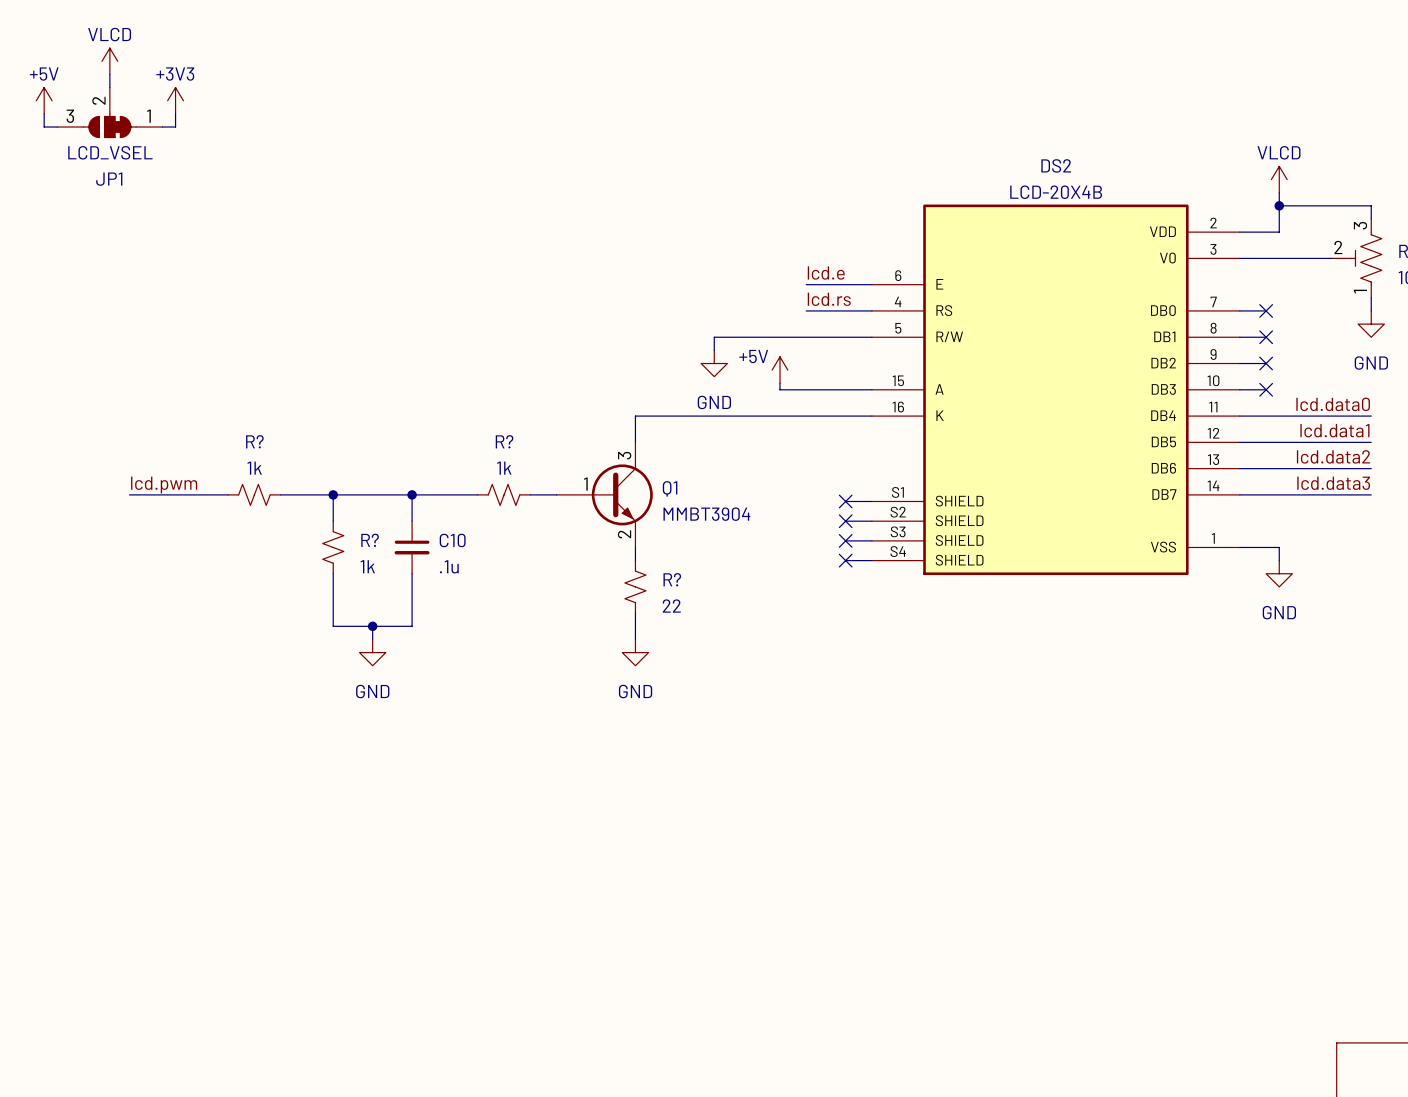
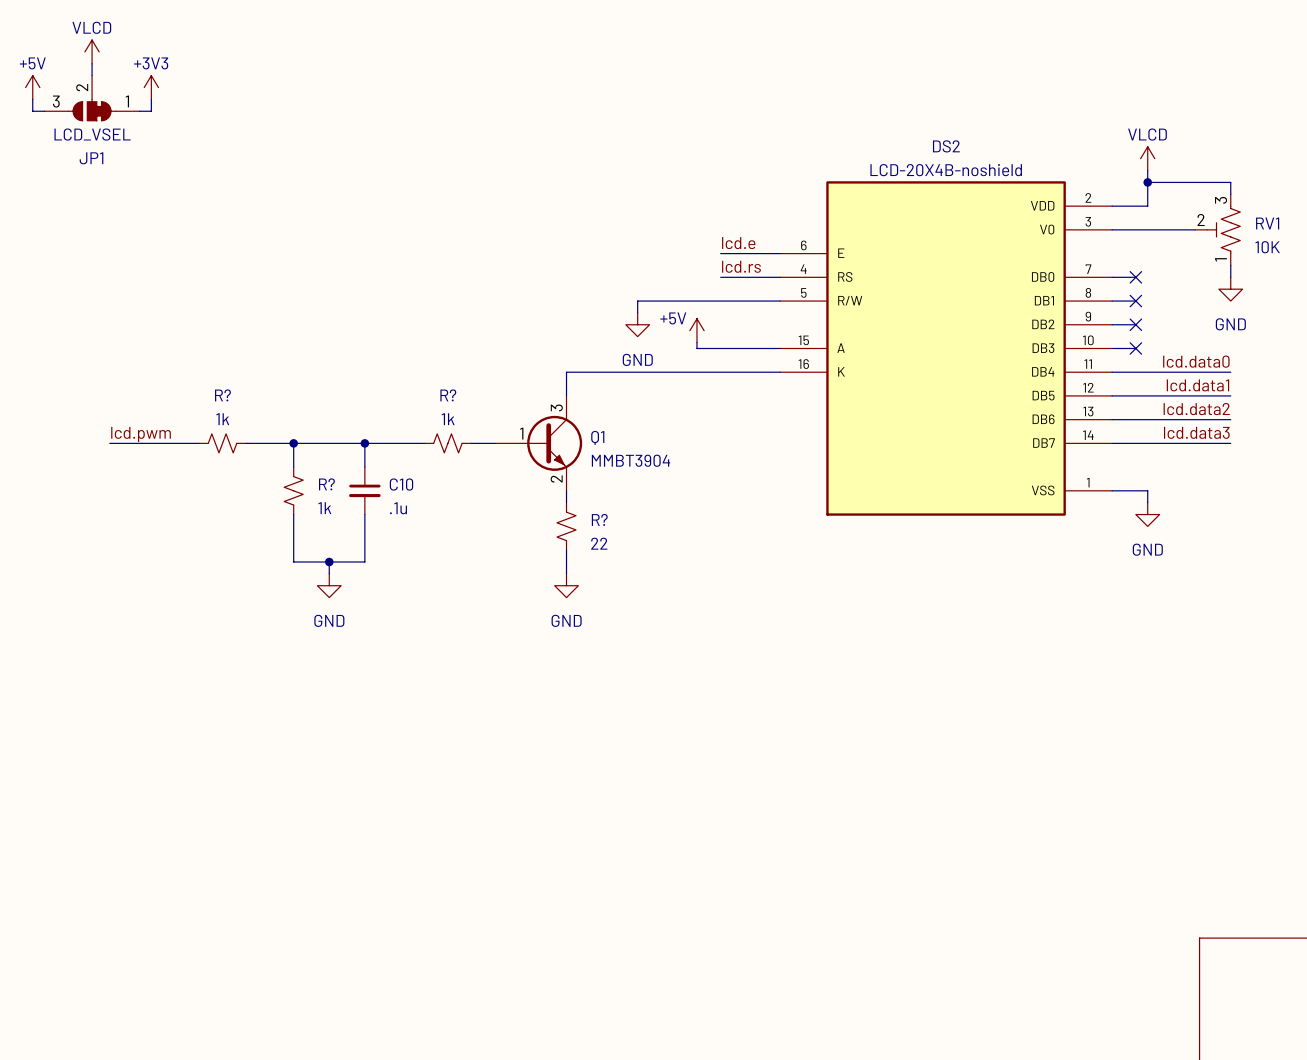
DS2 value: LCD-20X4B (1056, 192) -> LCD-20X4B-noshield (946, 170)
DS2 symbol: [871, 204, 1240, 576] -> [780, 181, 1113, 516]
wire: (845, 501) (871, 501) -> none
no-connect mark: (845, 501) -> none
wire: (845, 521) (871, 521) -> none
no-connect mark: (845, 521) -> none
wire: (845, 540) (871, 540) -> none
no-connect mark: (845, 540) -> none
wire: (845, 560) (871, 560) -> none
no-connect mark: (845, 560) -> none

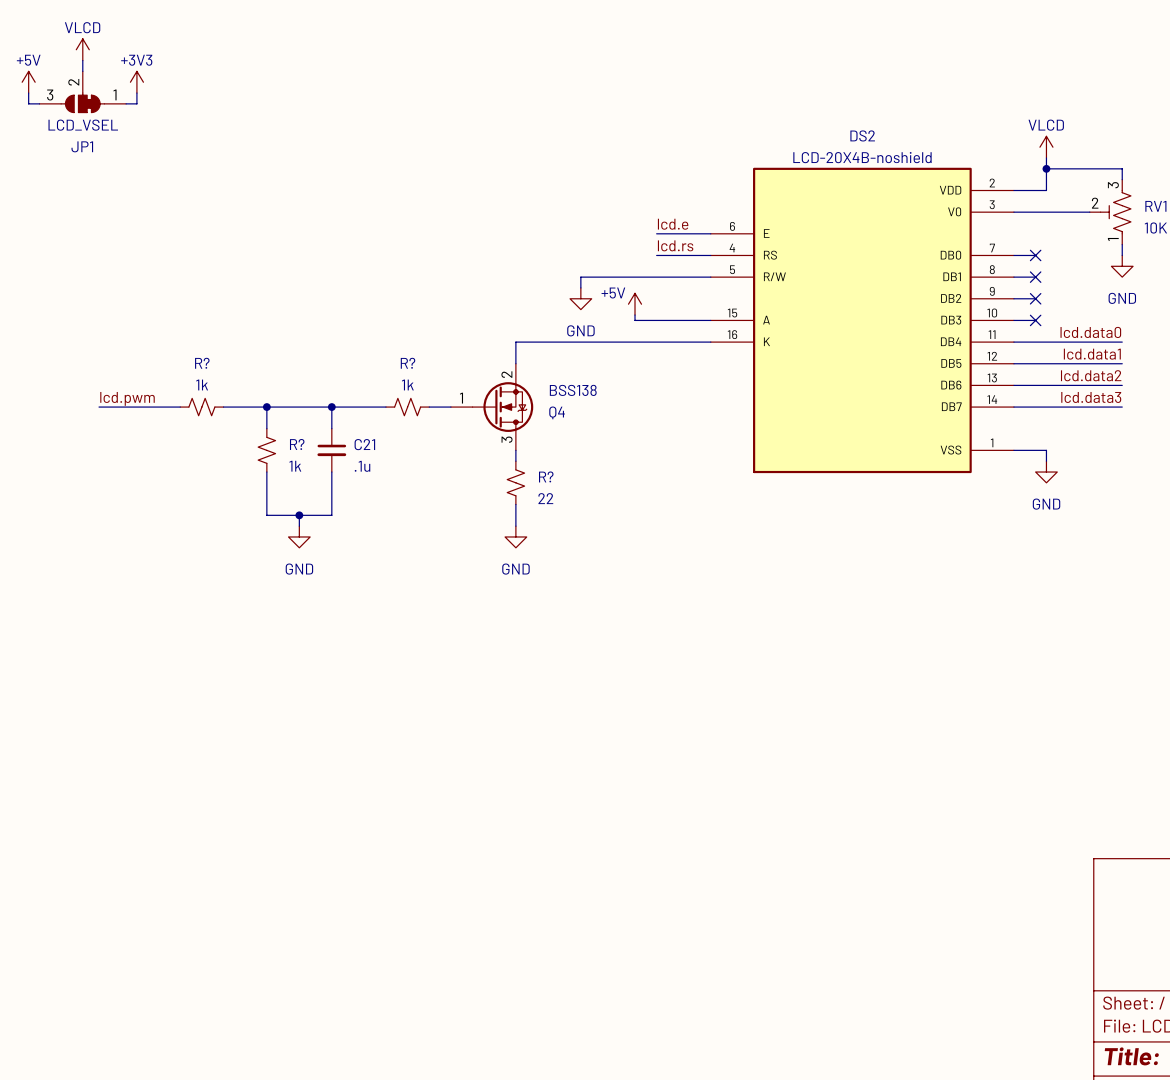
Q1: MMBT3904 (538, 443) -> none
Q4: none -> BSS138 (492, 407)
C10 name: C10 (401, 484) -> C21 (364, 444)

